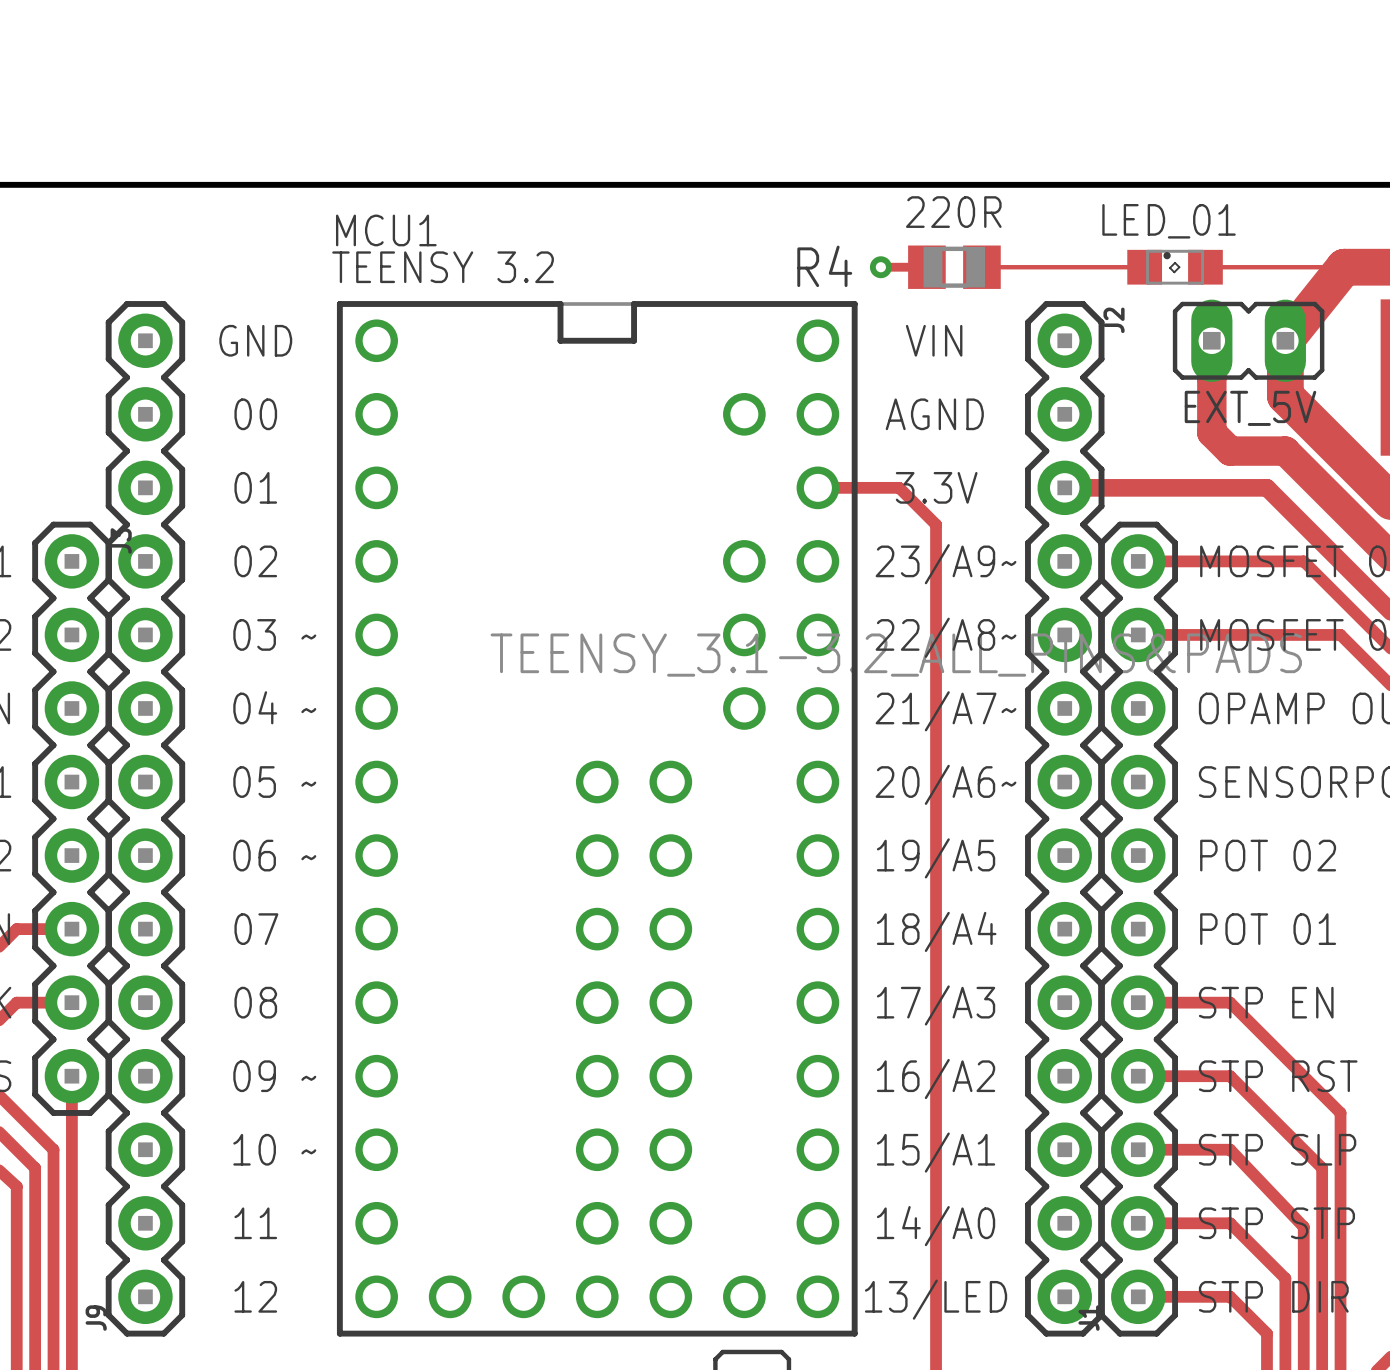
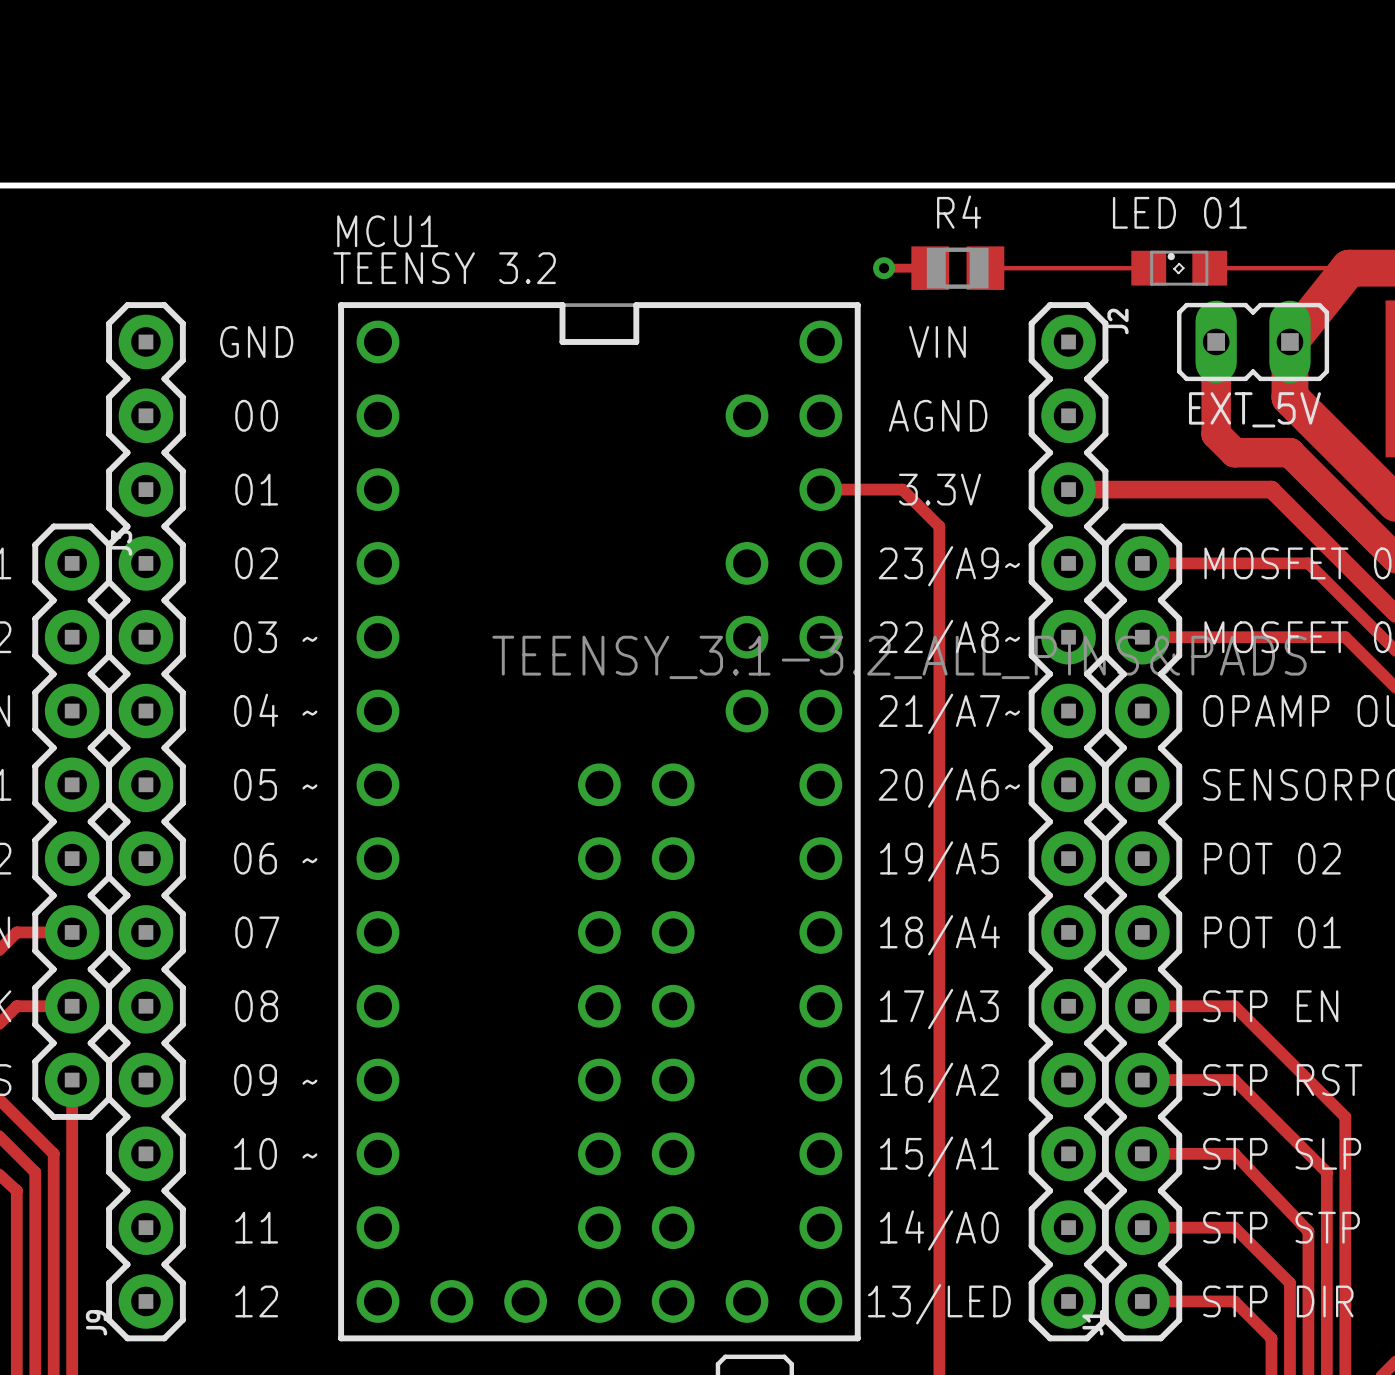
text: none -> R4 (959, 212)
R4 value: 220R (953, 212) -> none
text: none -> LED 01 (1179, 212)
LED_01 name: LED_01 (1169, 221) -> none
R4 name: R4 (824, 266) -> none

